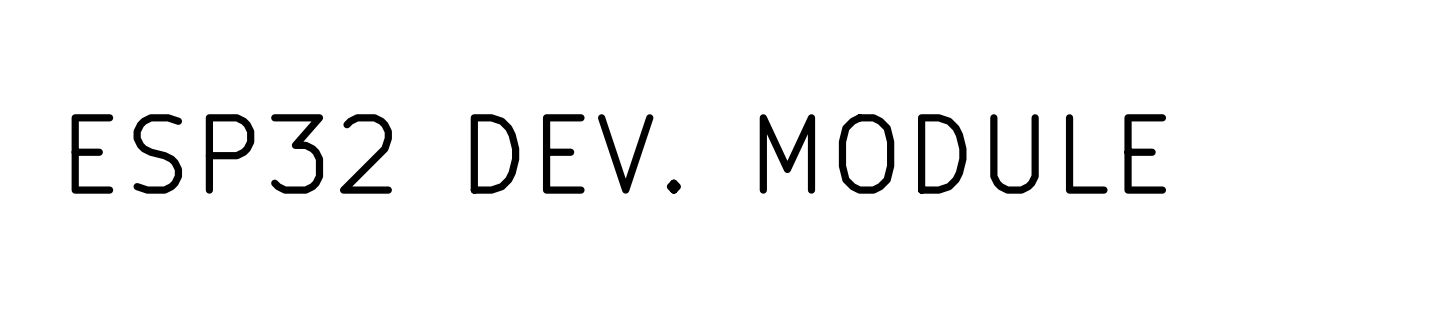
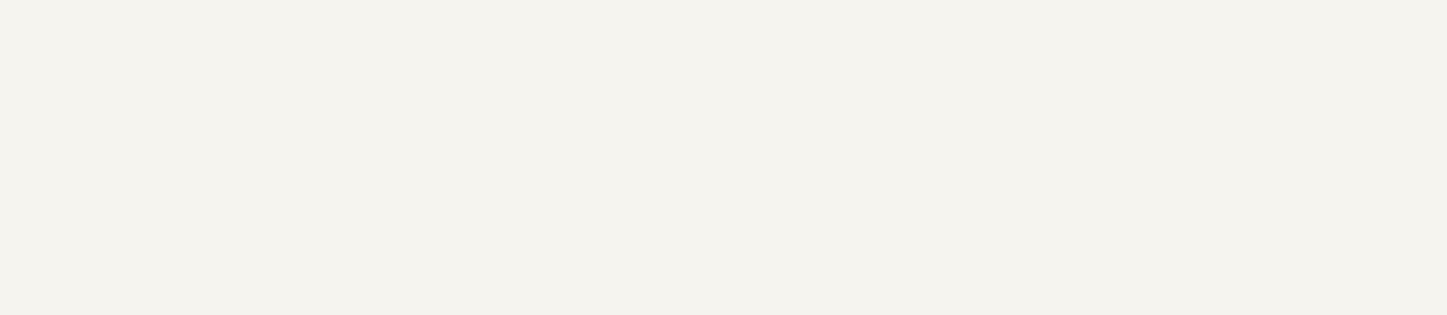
text: ESP32 DEV. MODULE (618, 153) -> none

